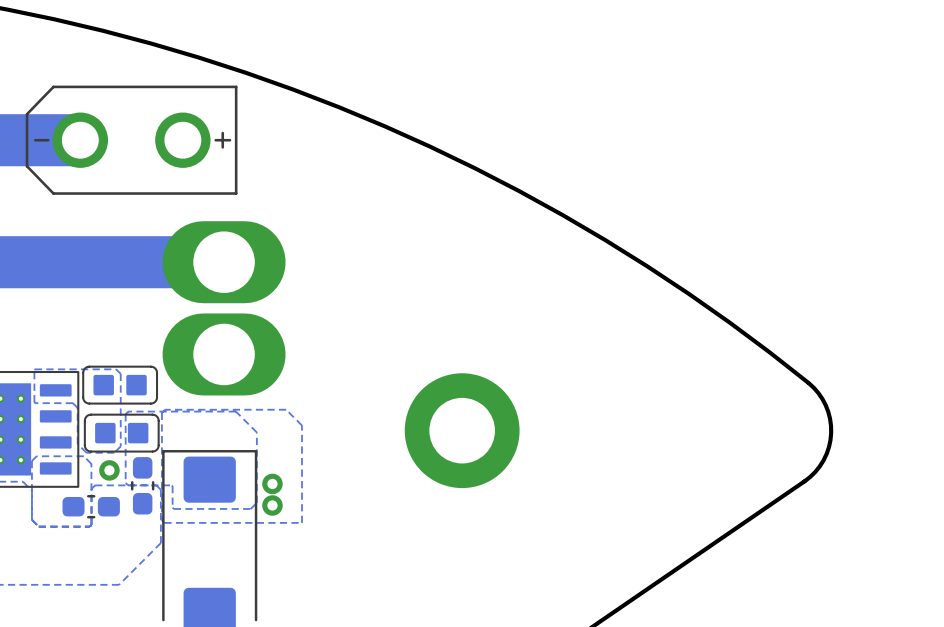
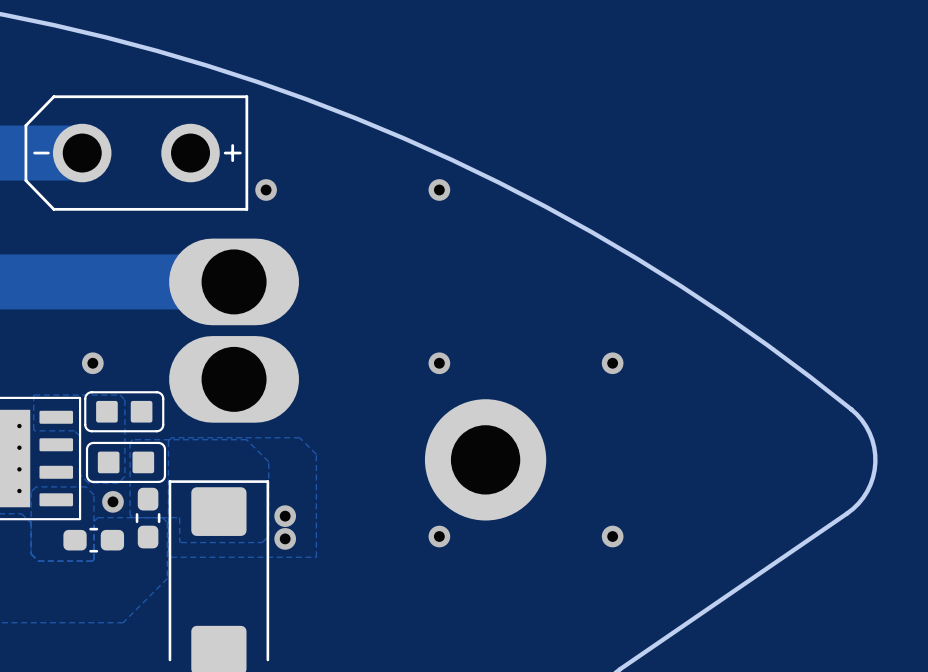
via: none -> (266, 189)
via: none -> (439, 189)
via: none -> (92, 363)
via: none -> (439, 363)
via: none -> (612, 363)
via: none -> (439, 536)
via: none -> (612, 536)

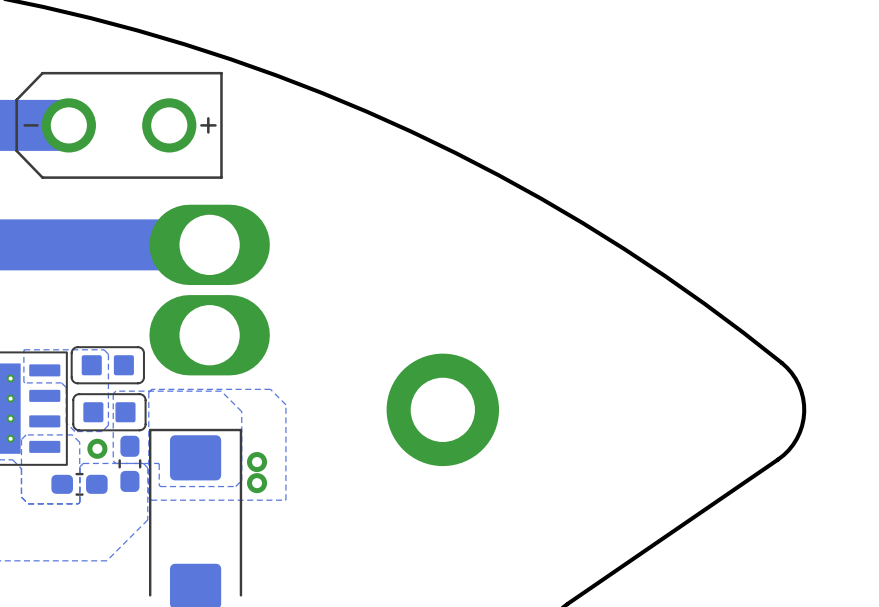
via: (266, 189) -> none
via: (439, 189) -> none
via: (92, 363) -> none
via: (439, 363) -> none
via: (612, 363) -> none
via: (439, 536) -> none
via: (612, 536) -> none

